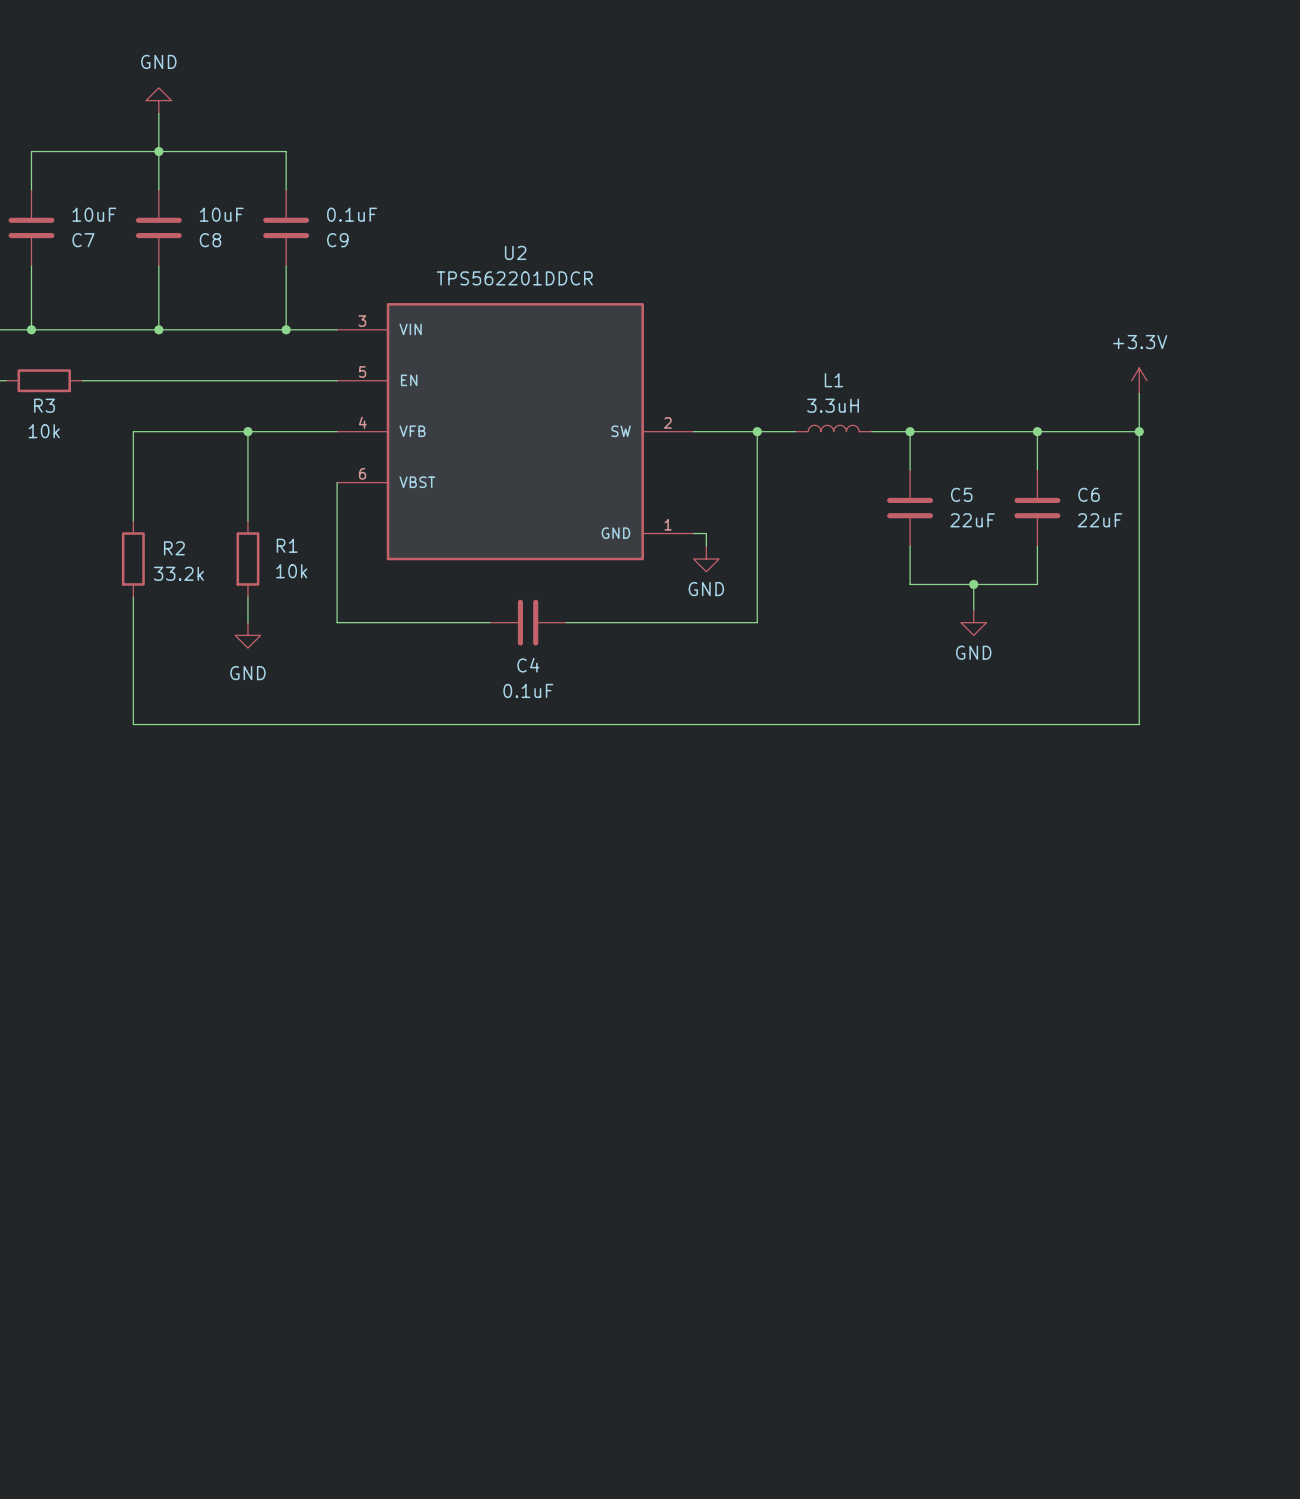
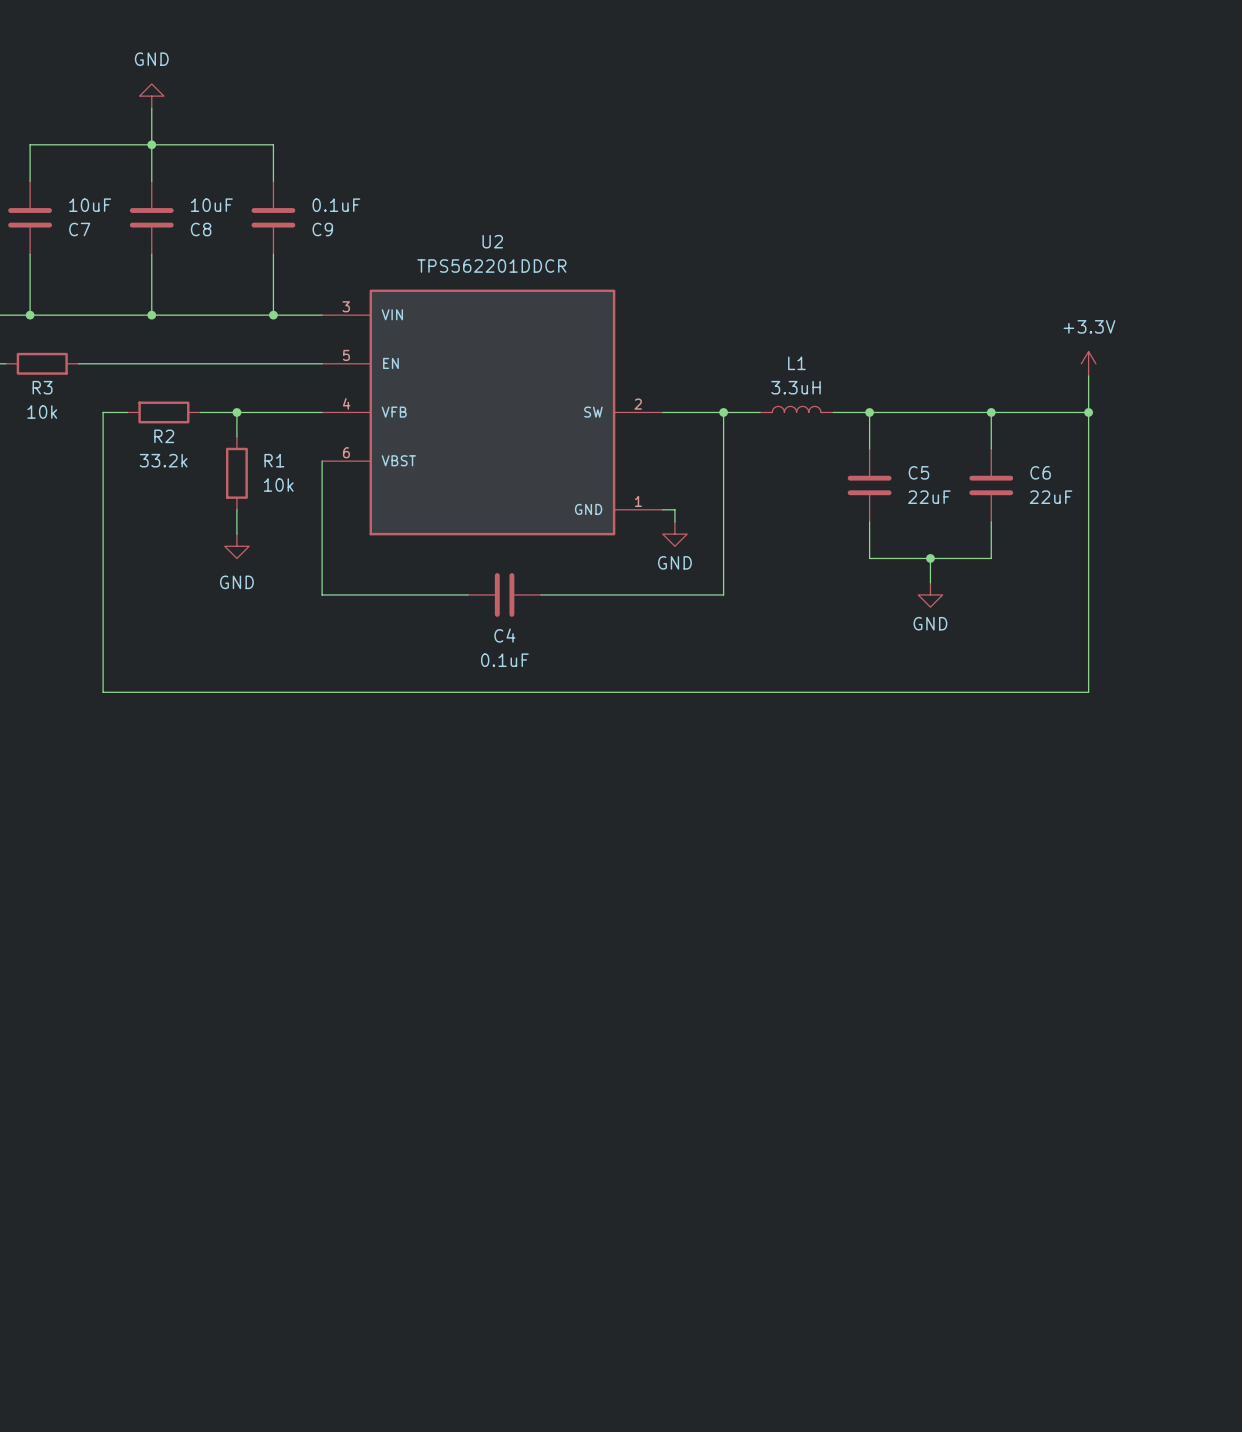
wire: (209, 431) (133, 431) (133, 520) -> none
wire: (247, 457) (247, 520) -> none
R2 rotation: 0° (133, 558) -> 90° clockwise (163, 412)
R2 position: (133, 558) -> (163, 412)
R1 position: (247, 558) -> (236, 473)
wire: (133, 597) (133, 724) -> (127, 412) (103, 412) (103, 692) (127, 692)
wire: (247, 597) (247, 622) -> (236, 509) (236, 534)
power symbol position: GND (247, 635) -> GND (236, 546)

